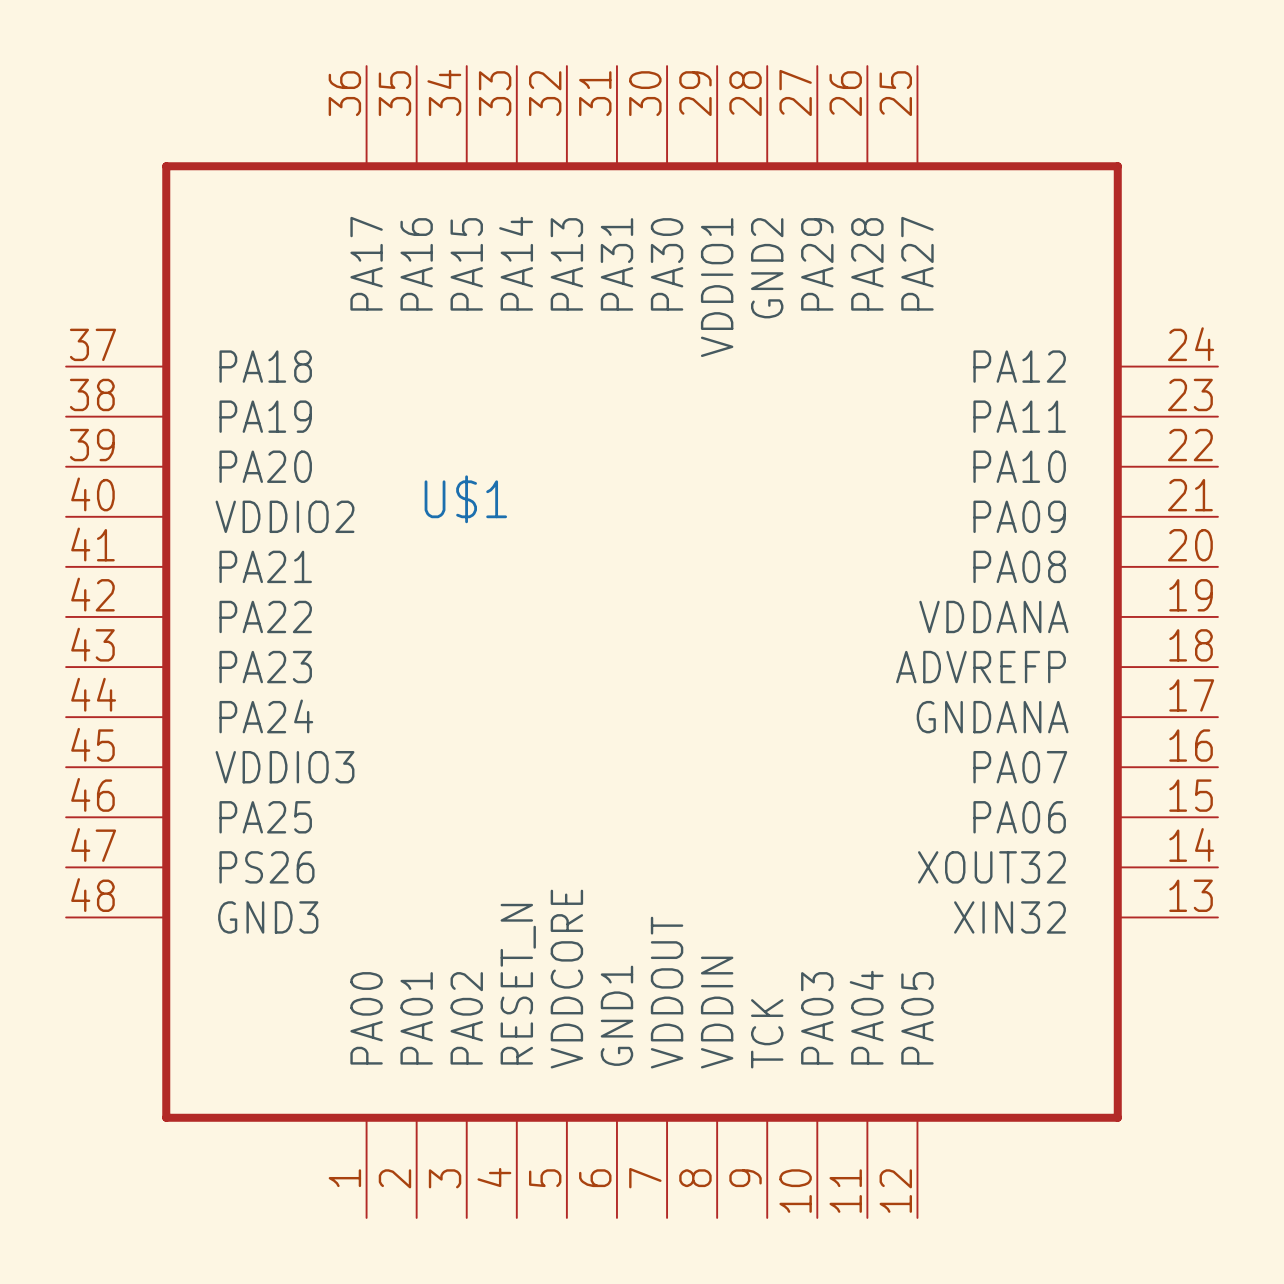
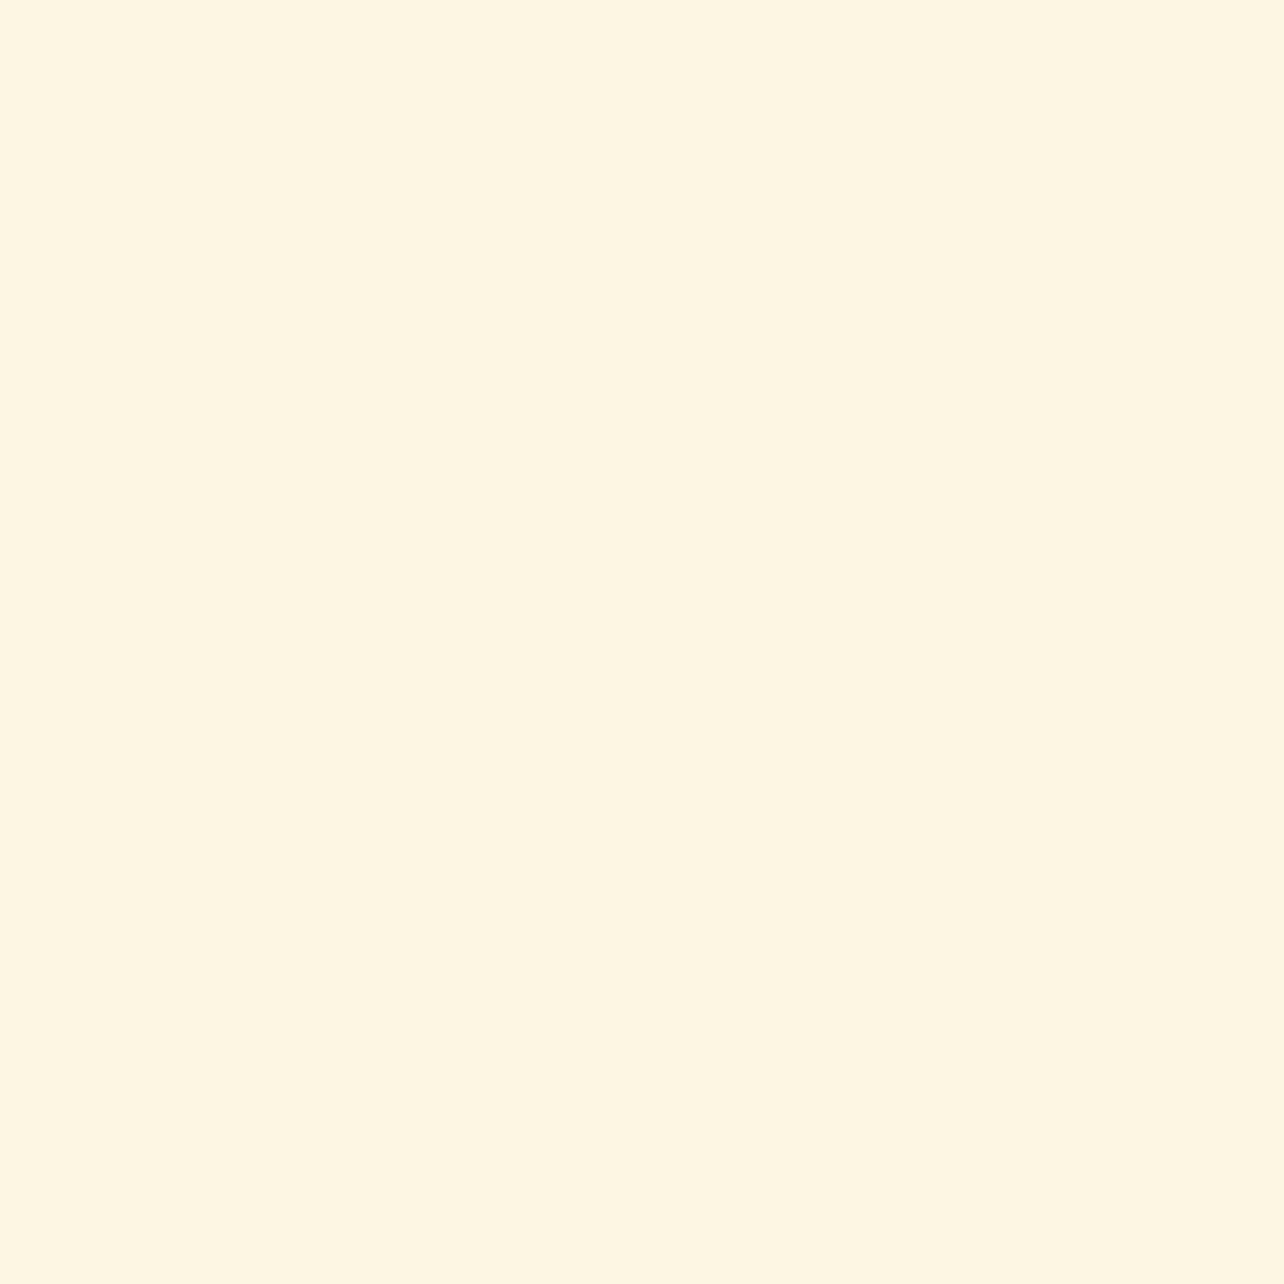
U$1: (642, 642) -> none

